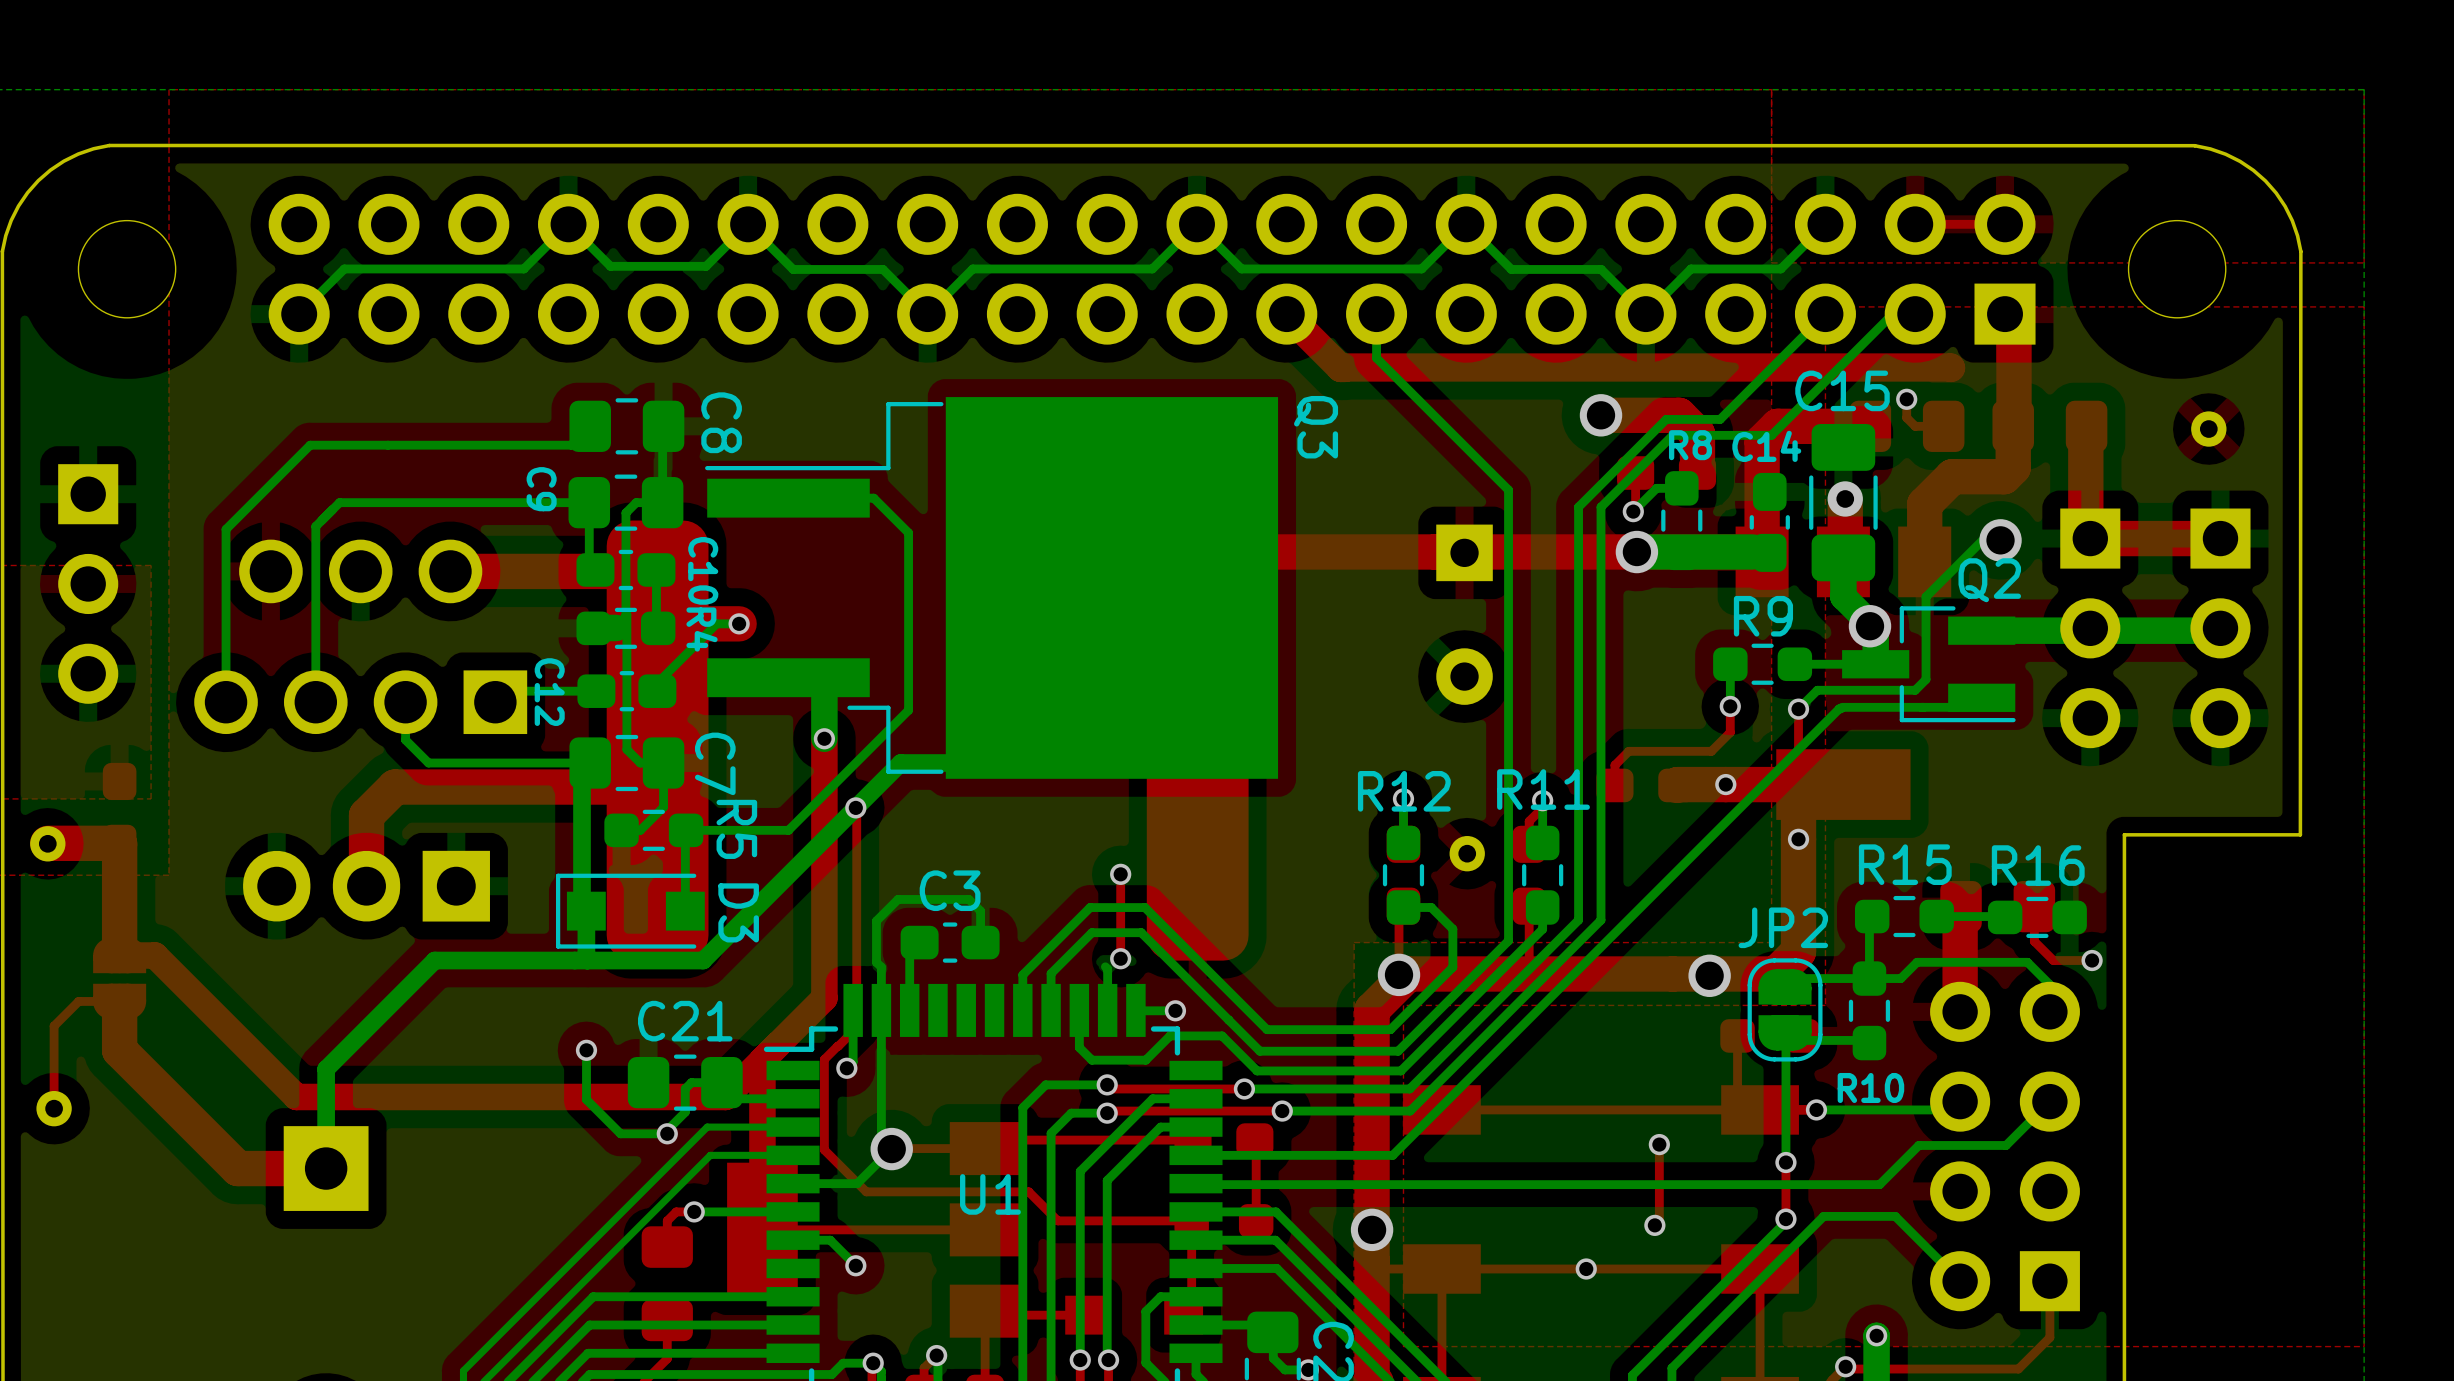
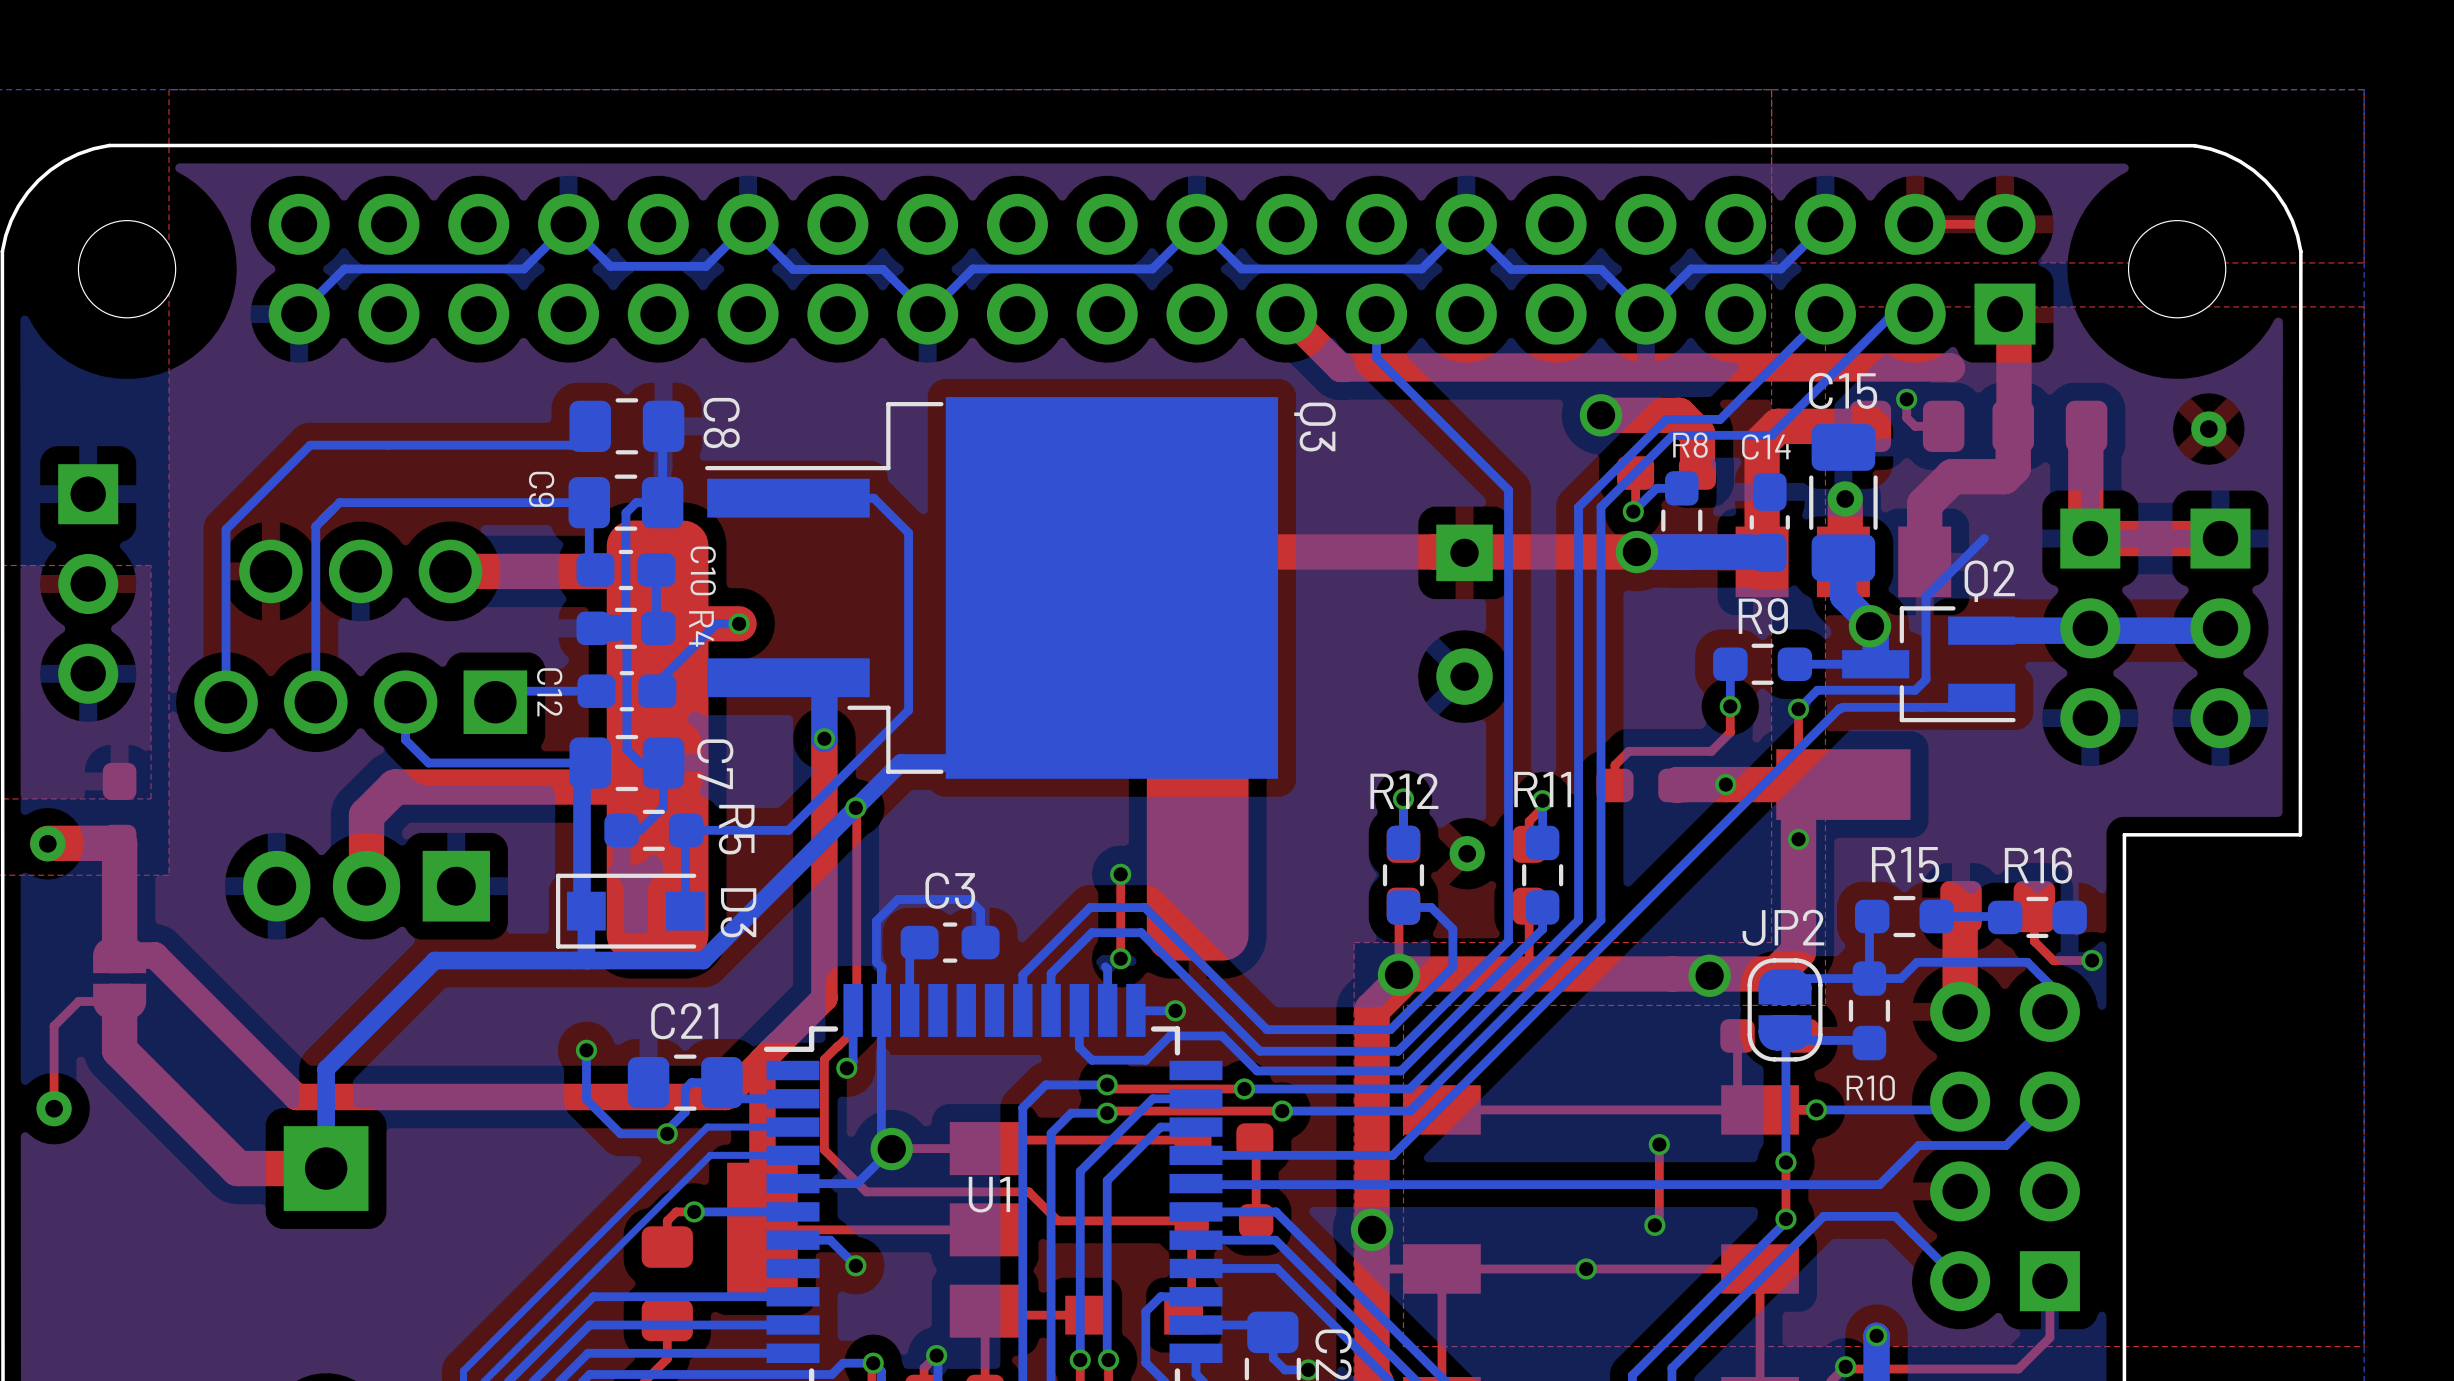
via: (2000, 540) -> none

